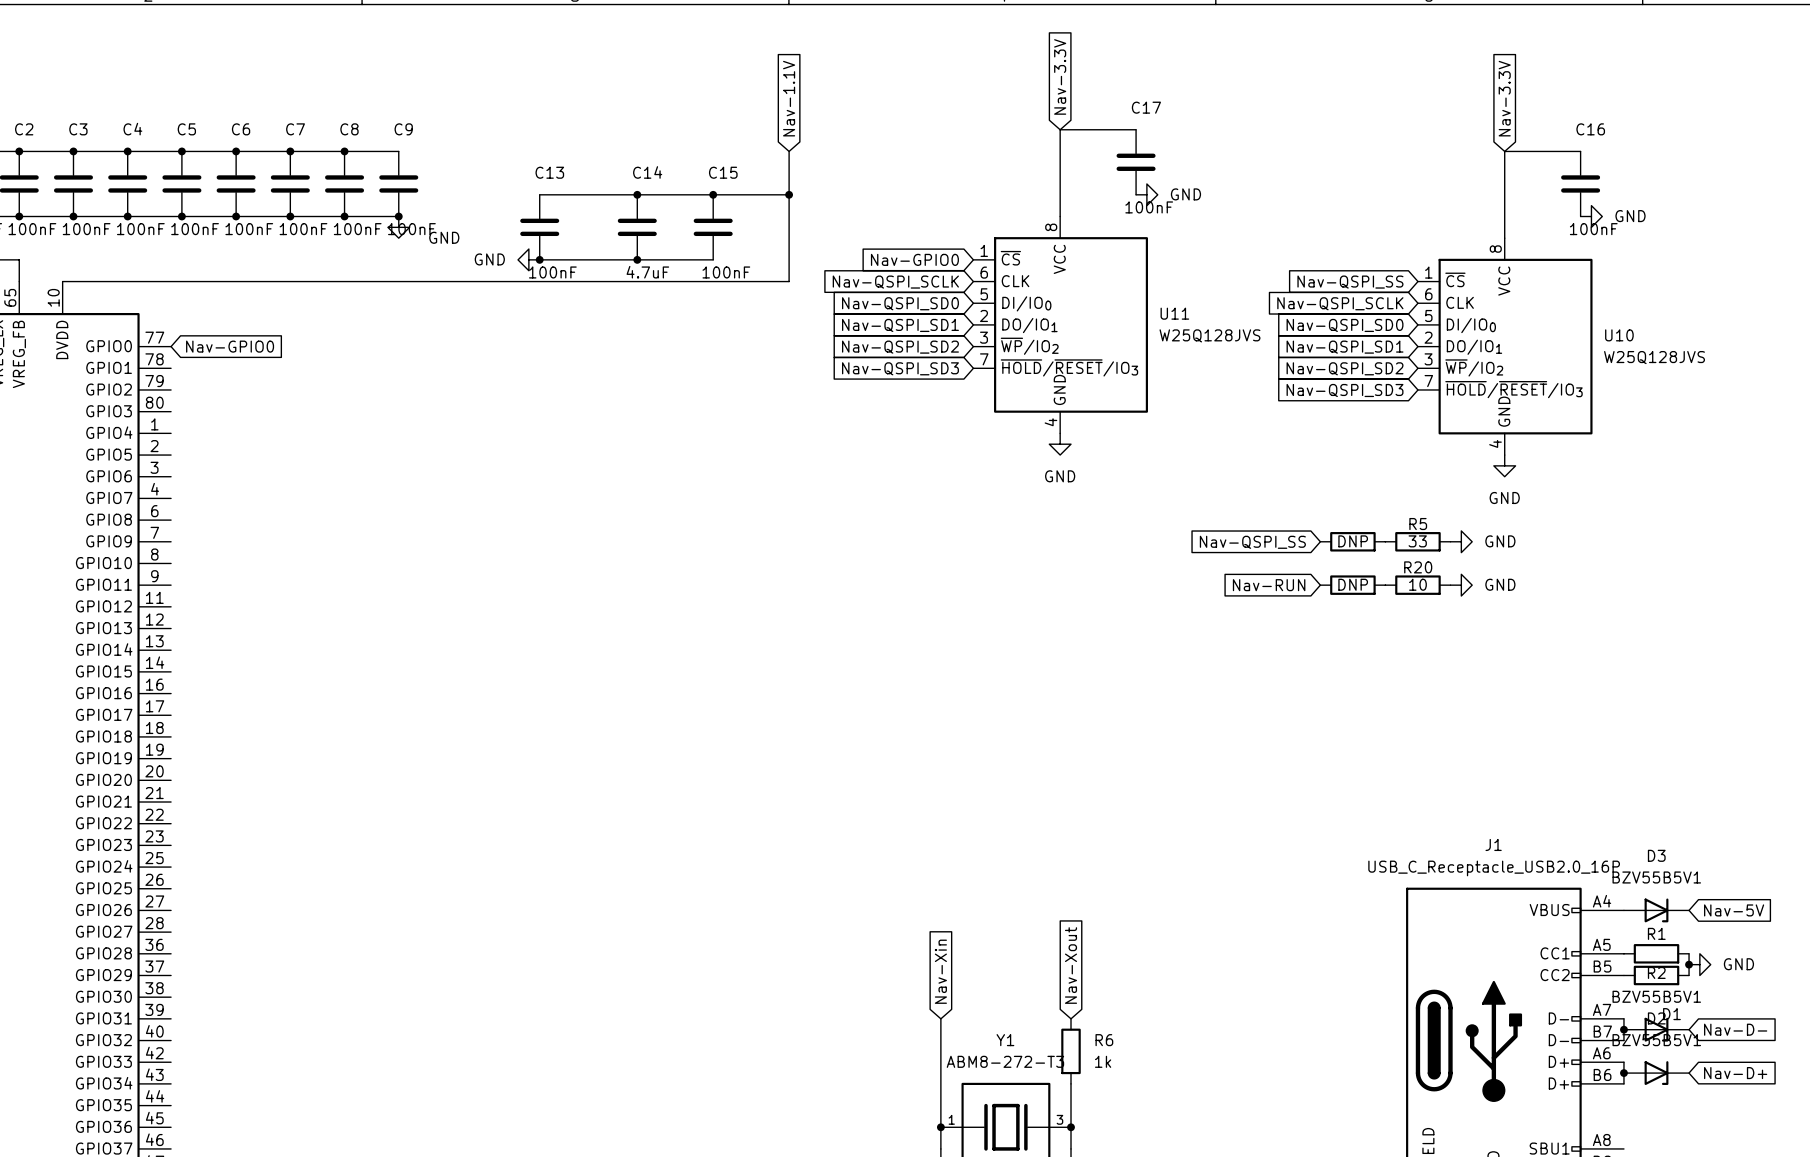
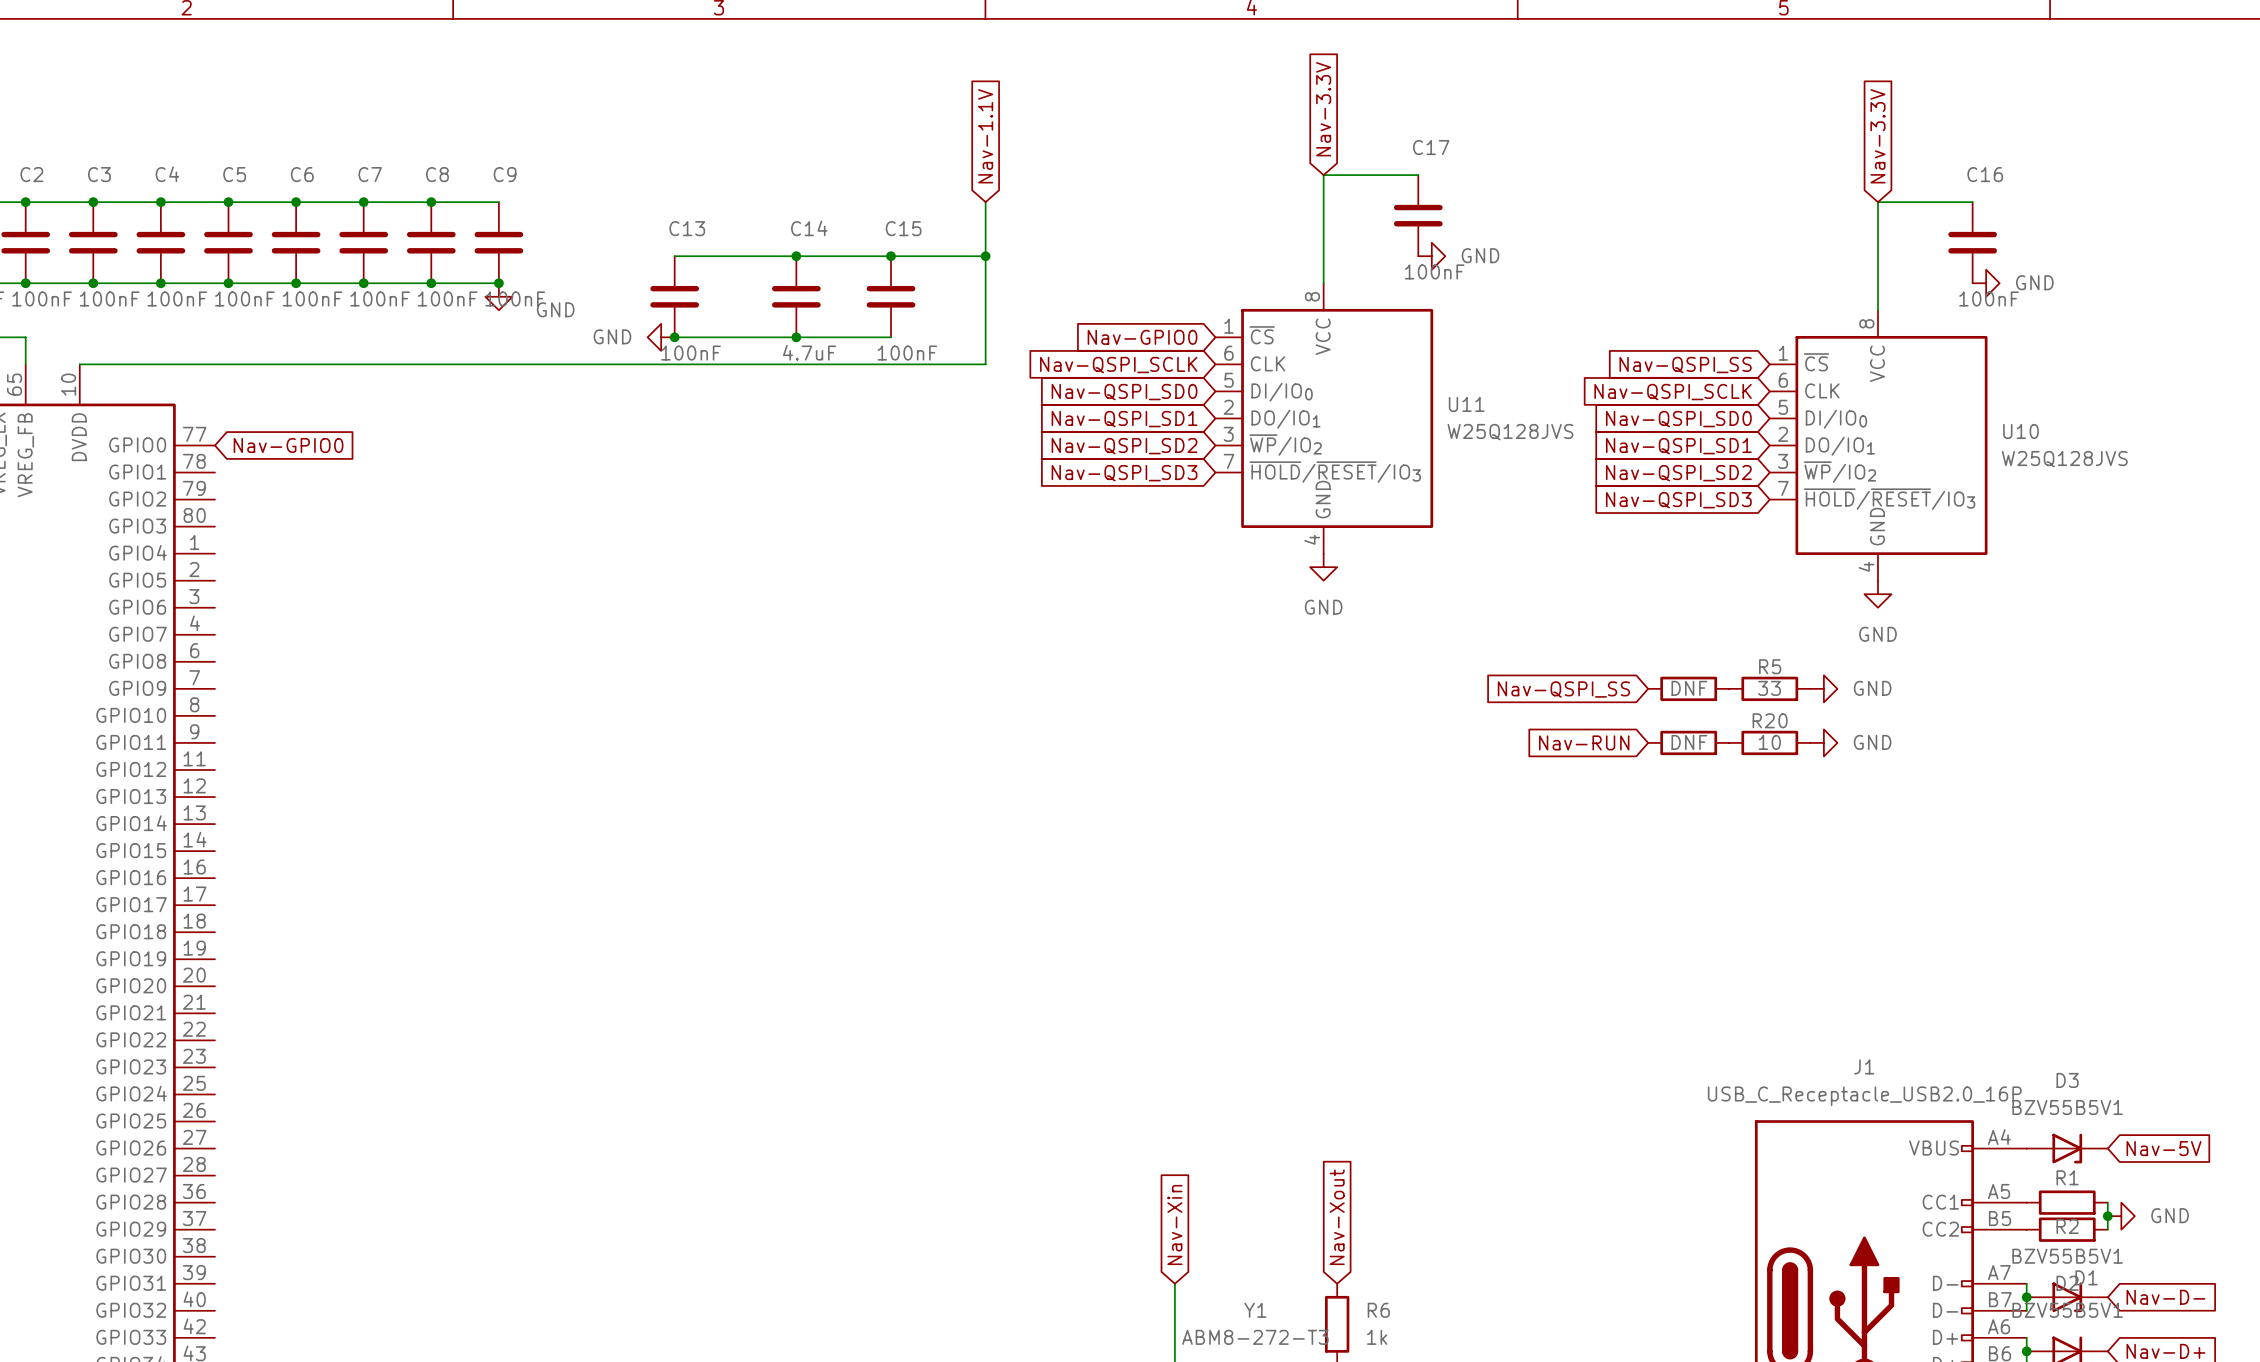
part value: DNP (1353, 541) -> DNF (1689, 688)
part value: DNP (1353, 584) -> DNF (1689, 742)

